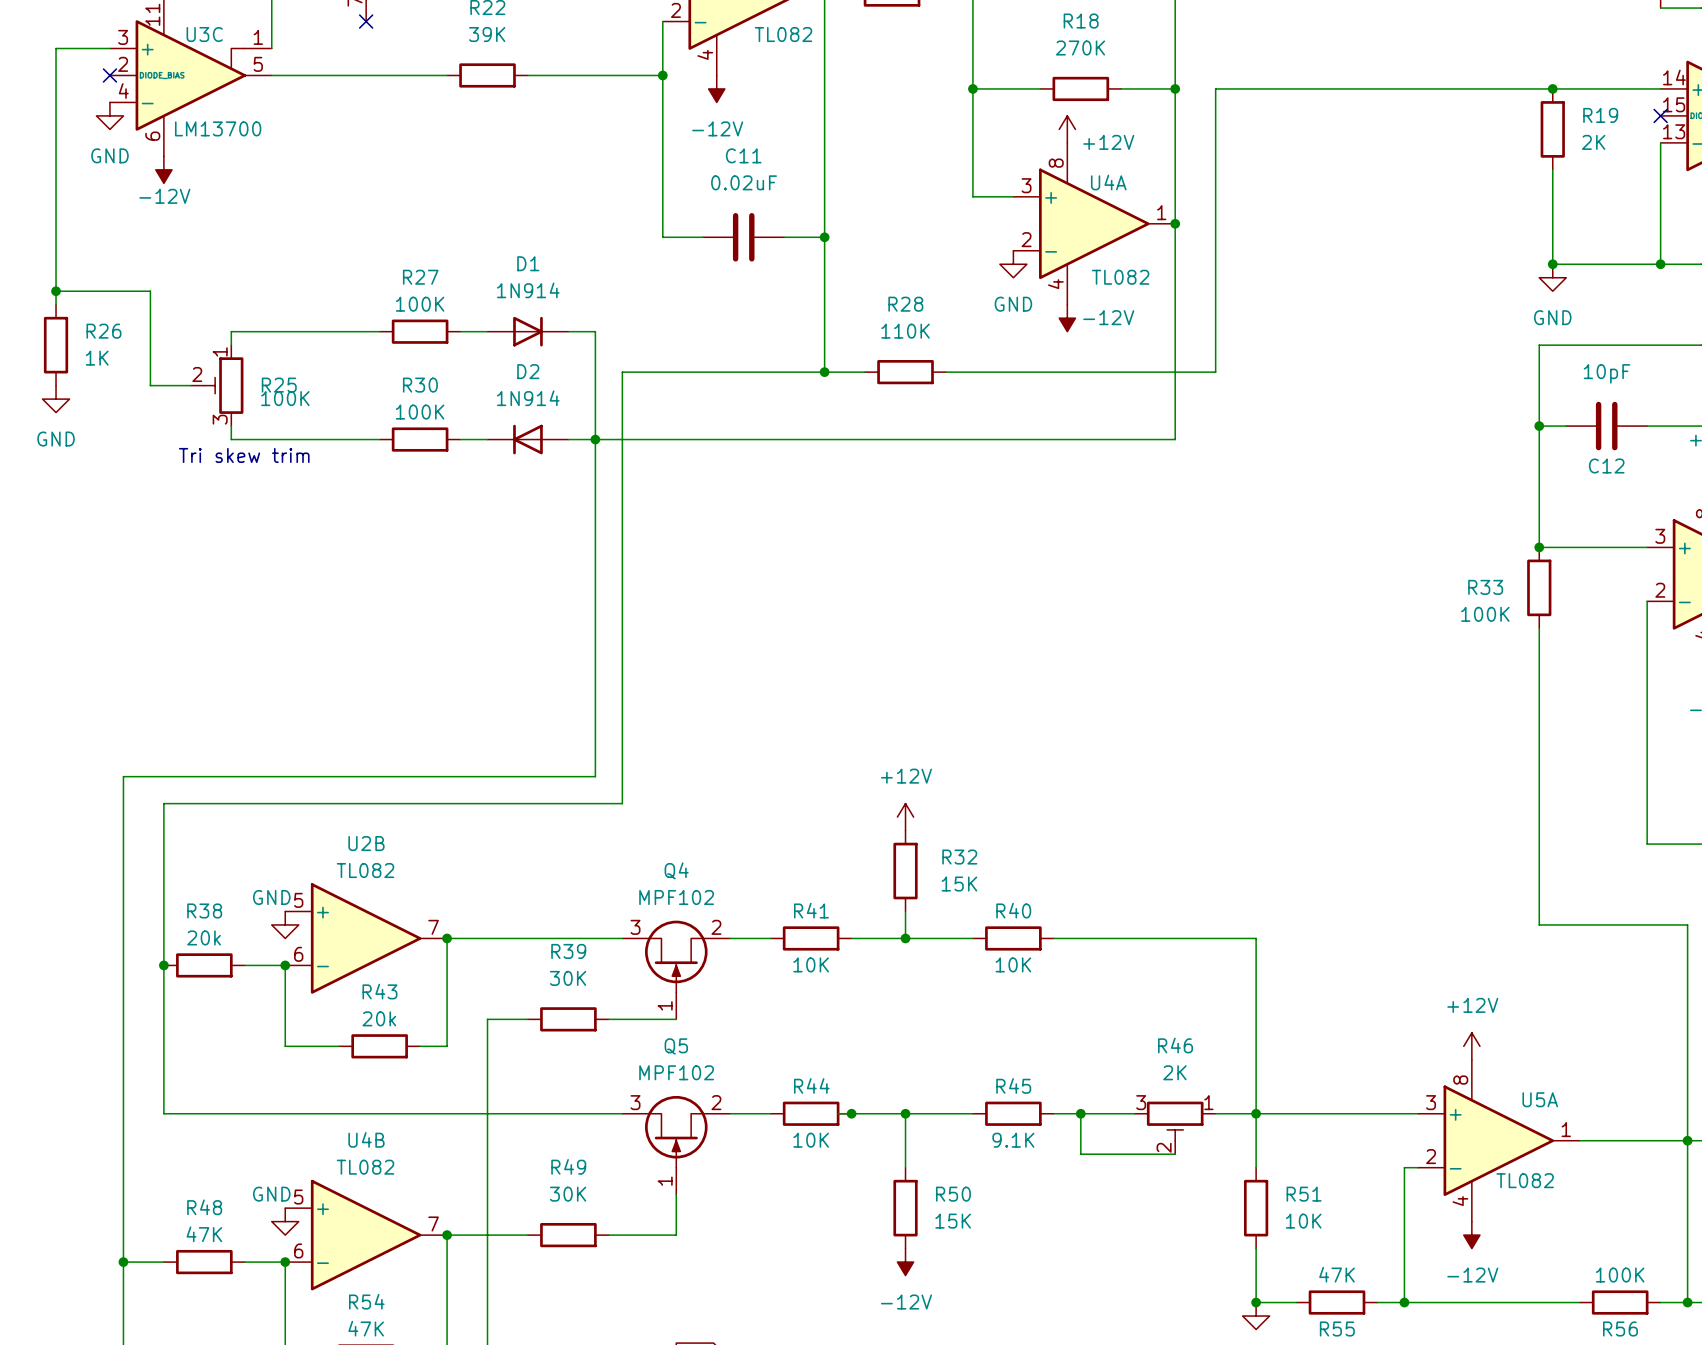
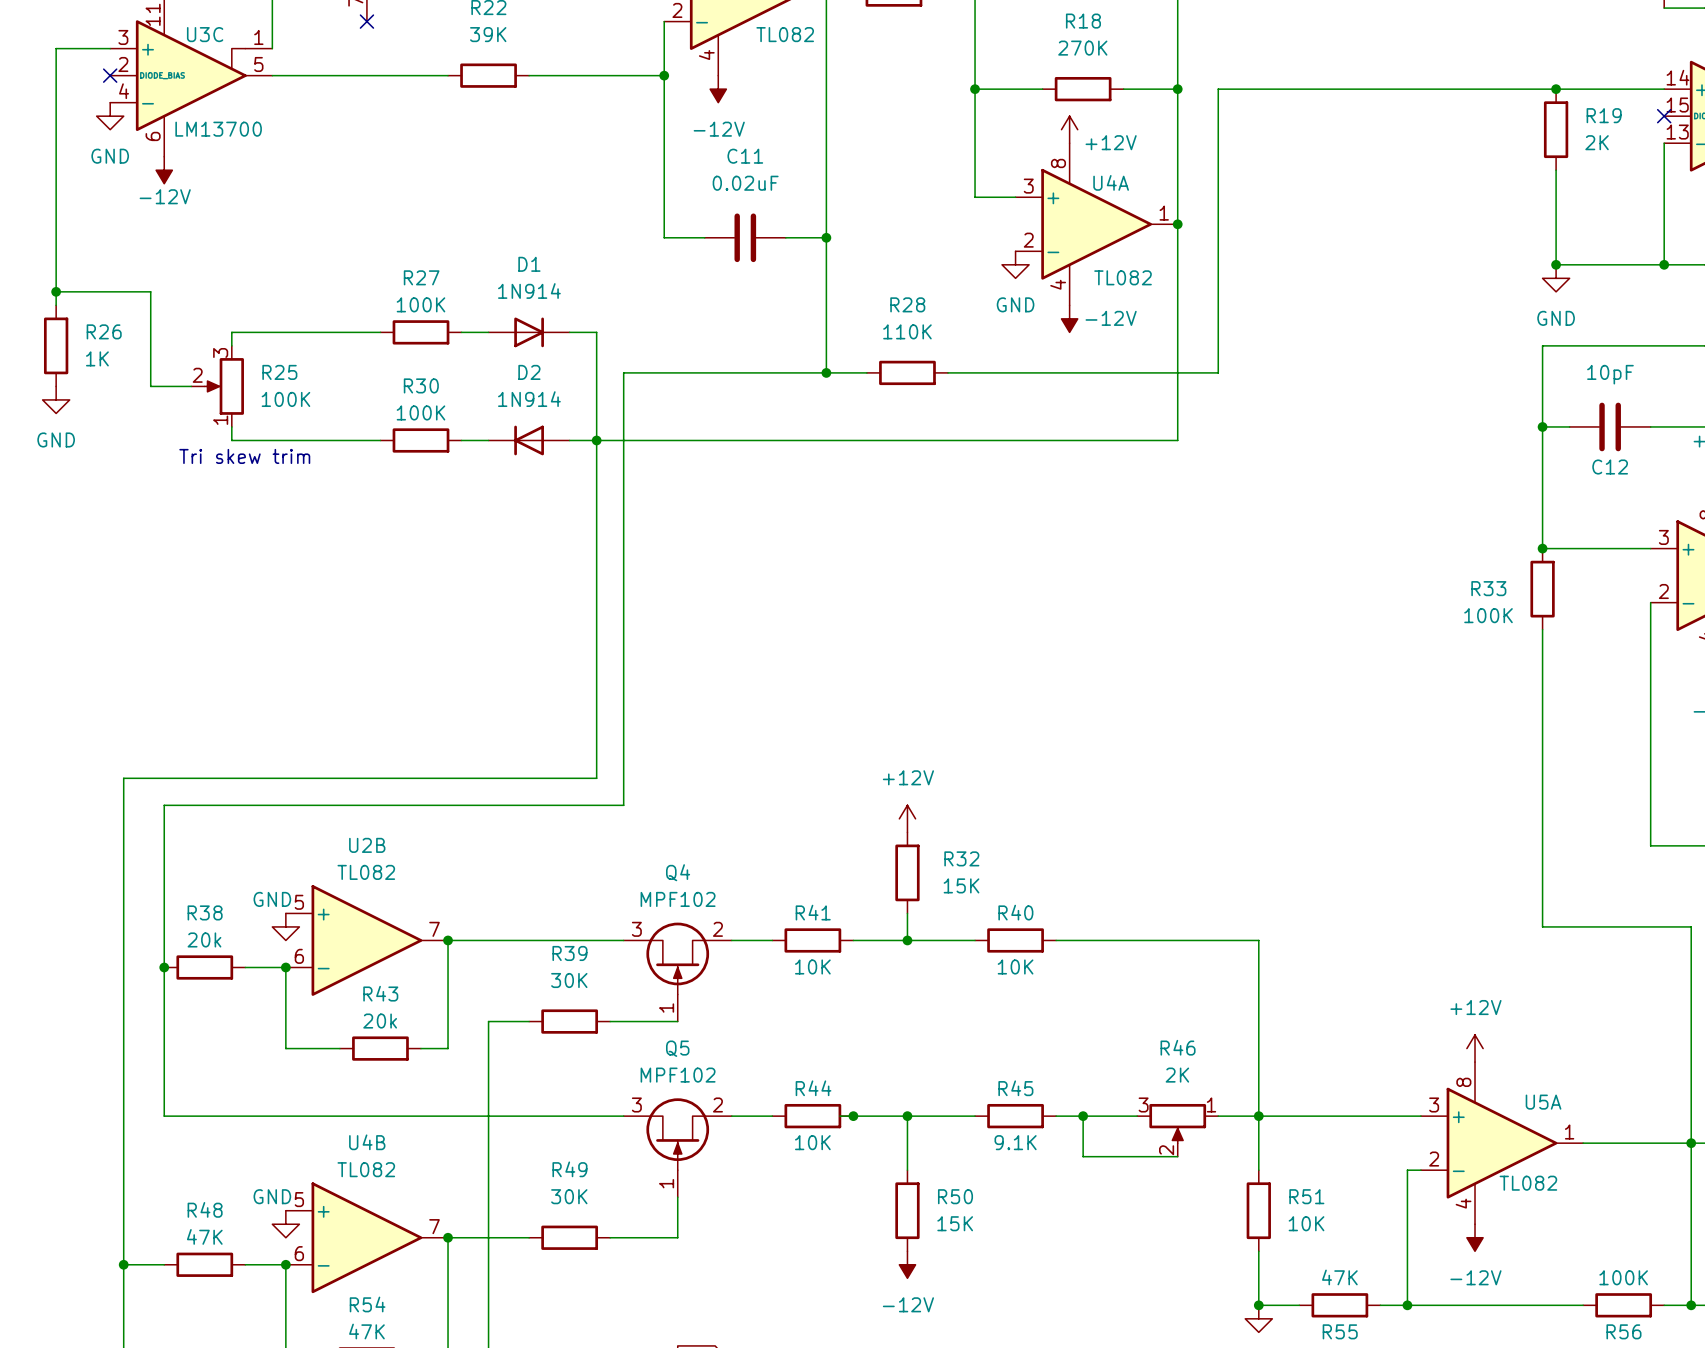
R25 symbol: [190, 345, 244, 427] -> [191, 345, 244, 427]
R46 symbol: [1134, 1101, 1216, 1155] -> [1137, 1103, 1219, 1157]

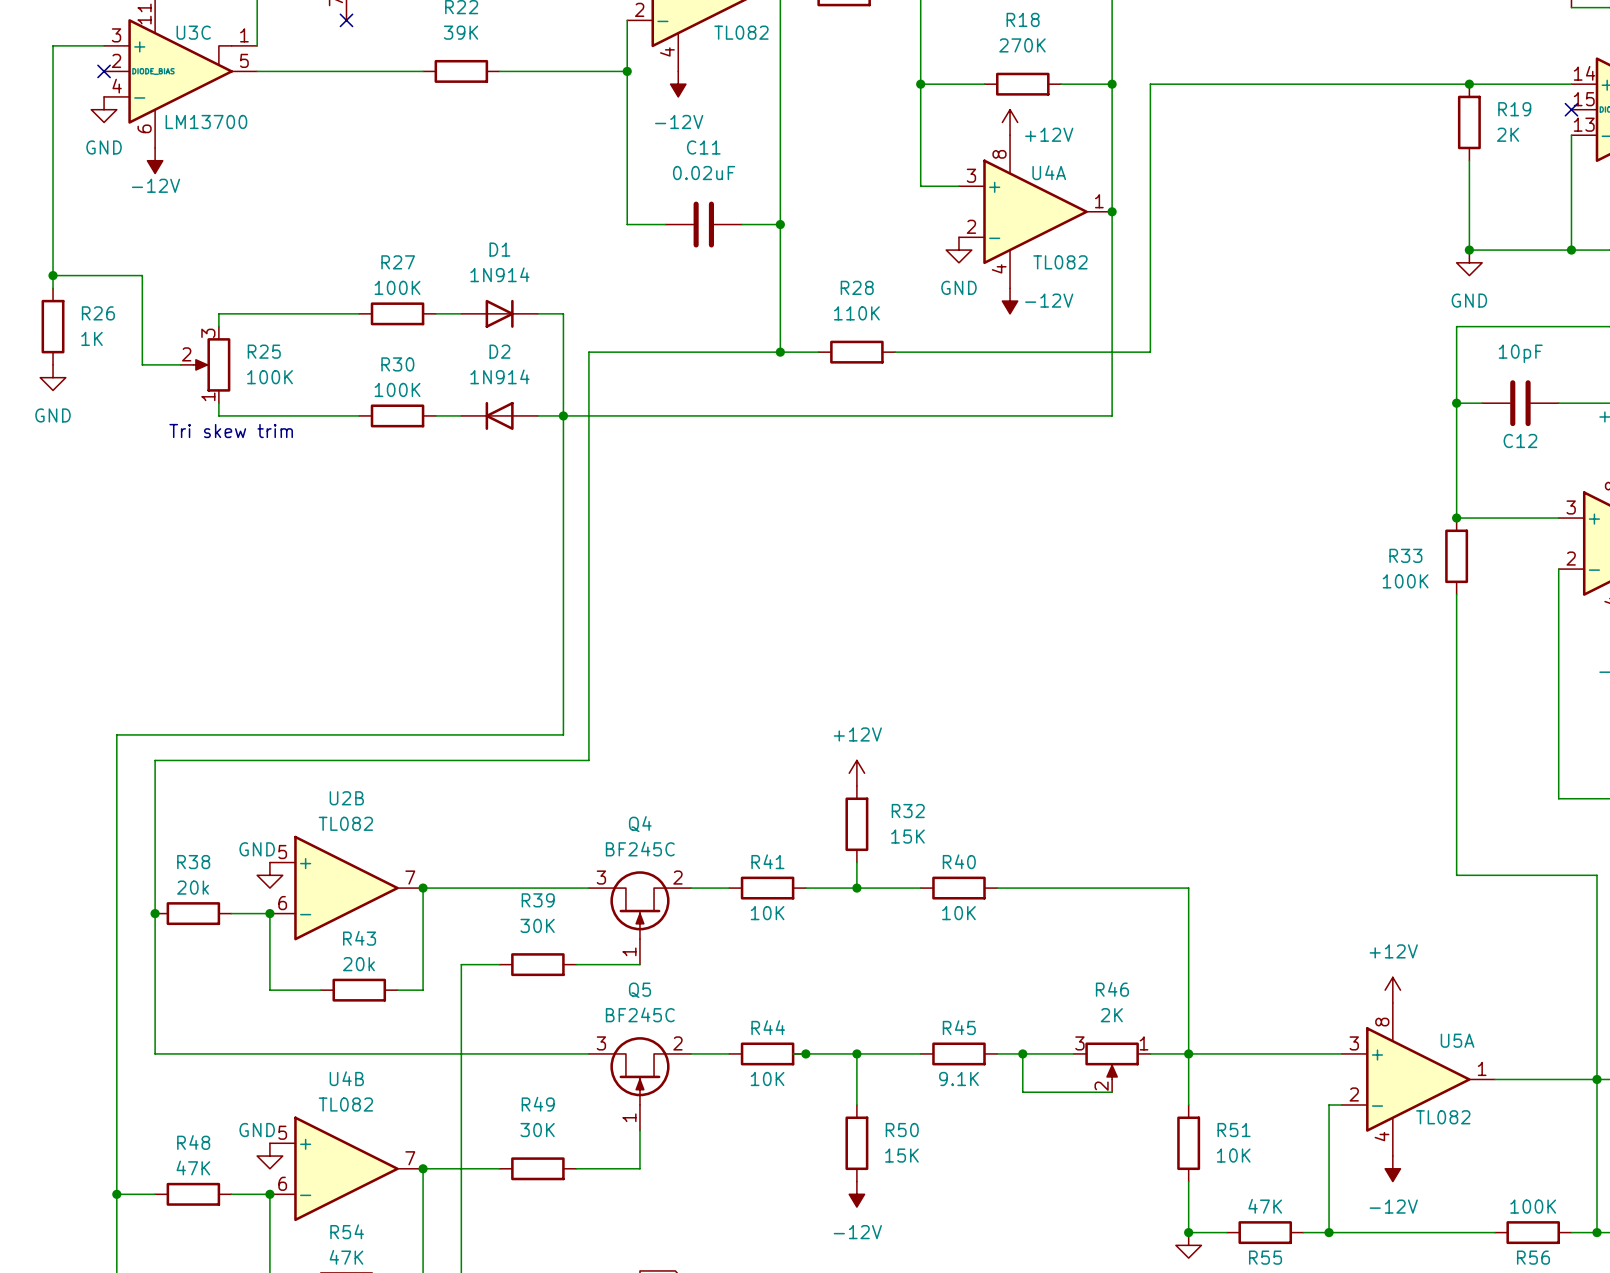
Q4 value: MPF102 (678, 899) -> BF245C (640, 849)
Q5 value: MPF102 (678, 1075) -> BF245C (640, 1014)

